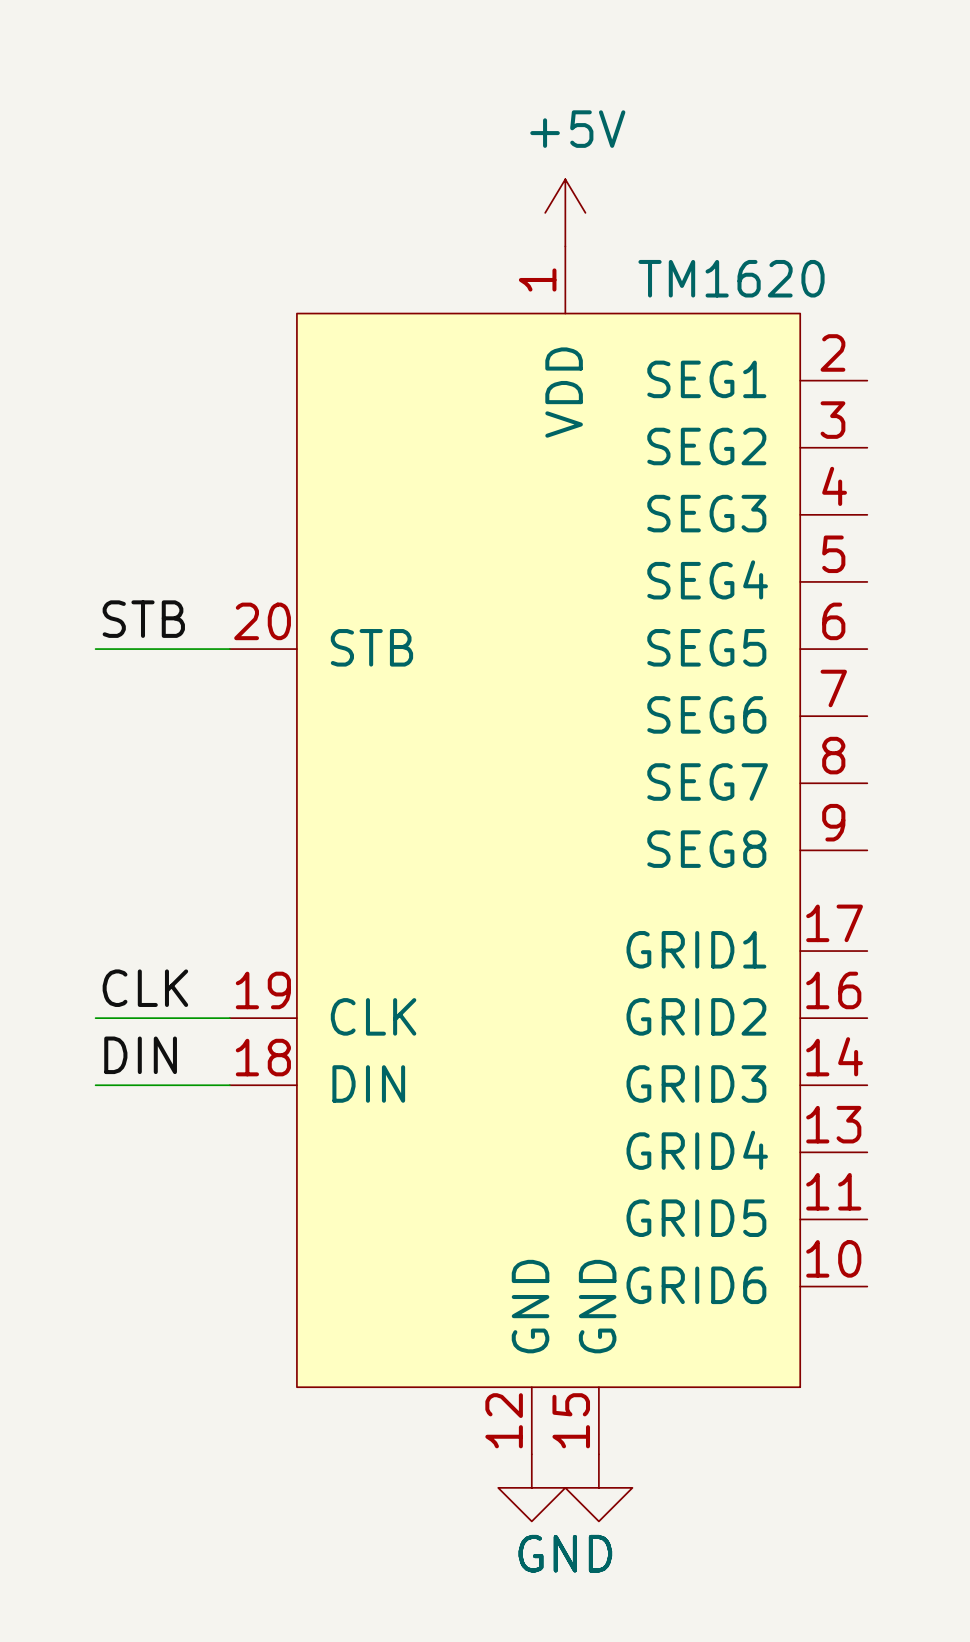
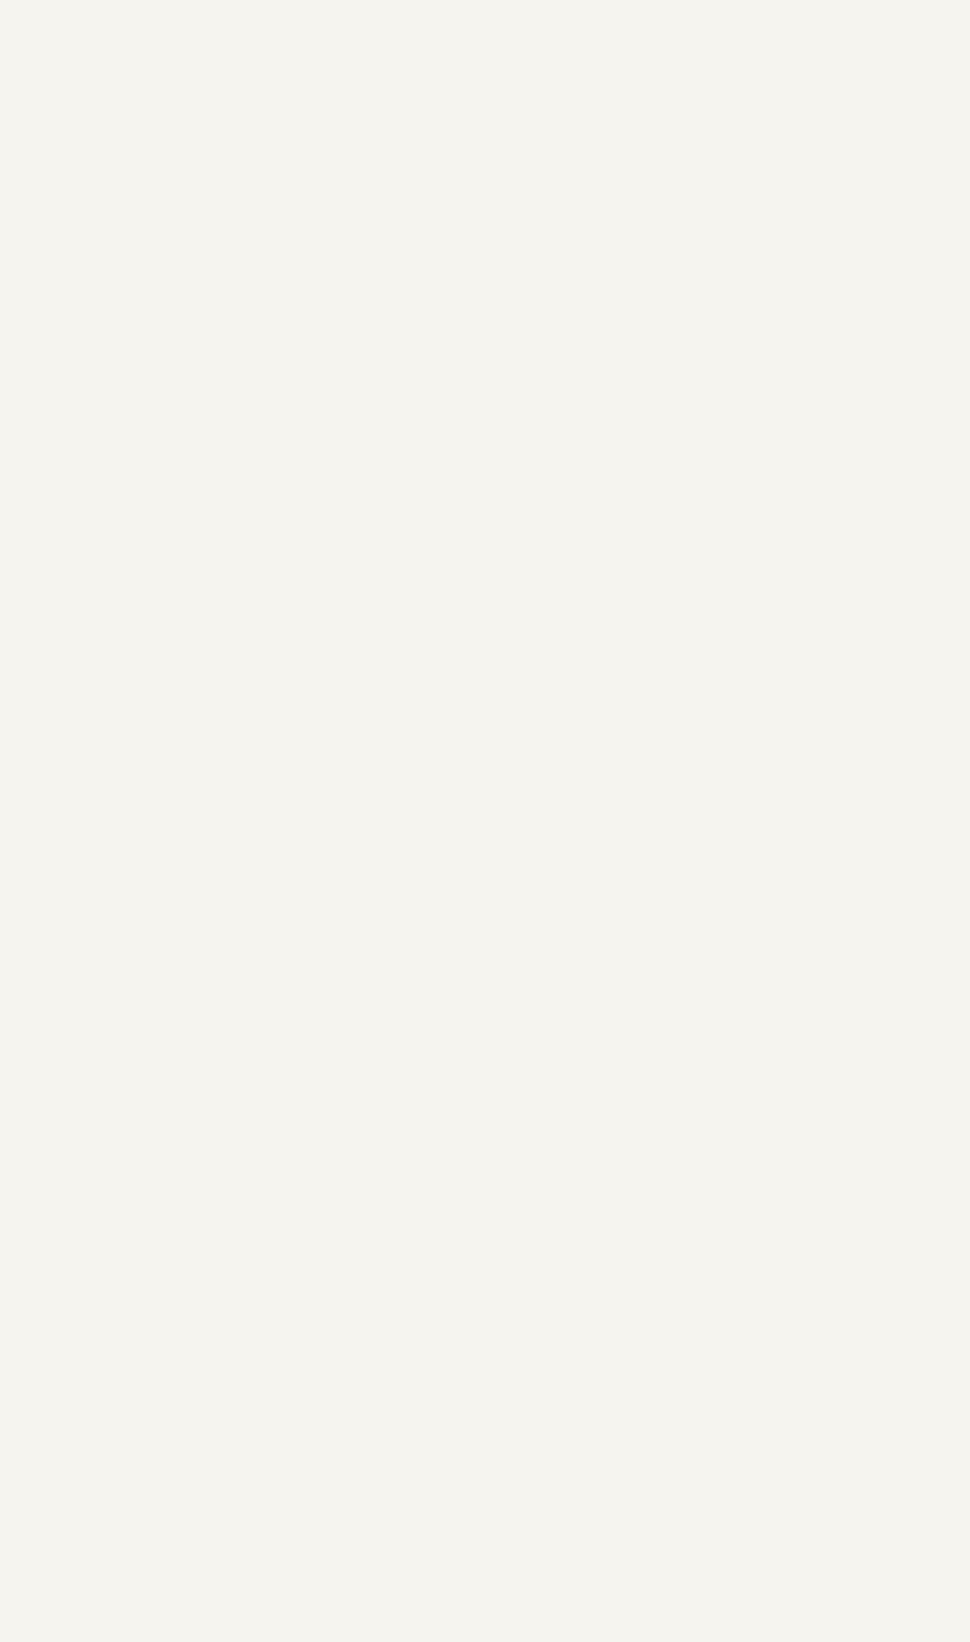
power symbol: +5V (565, 212) -> none
label: STB (143, 619) -> none
wire: (95, 649) (229, 649) -> none
part: TM1620 (548, 850) -> none
label: CLK (145, 988) -> none
wire: (95, 1018) (229, 1018) -> none
label: DIN (140, 1055) -> none
wire: (95, 1085) (229, 1085) -> none
power symbol: GND (531, 1487) -> none
power symbol: GND (598, 1487) -> none

